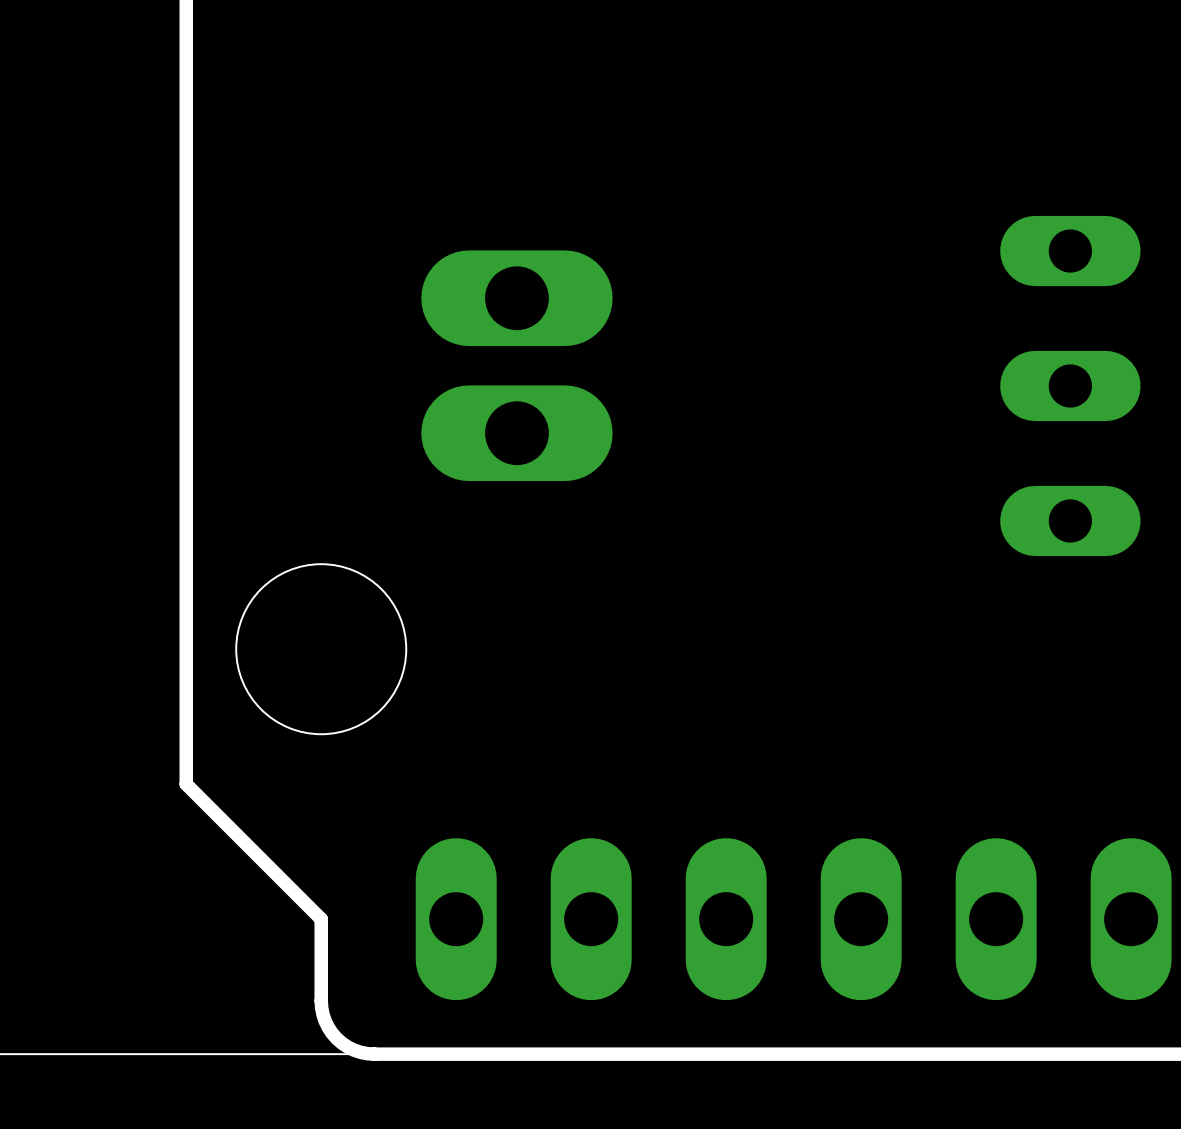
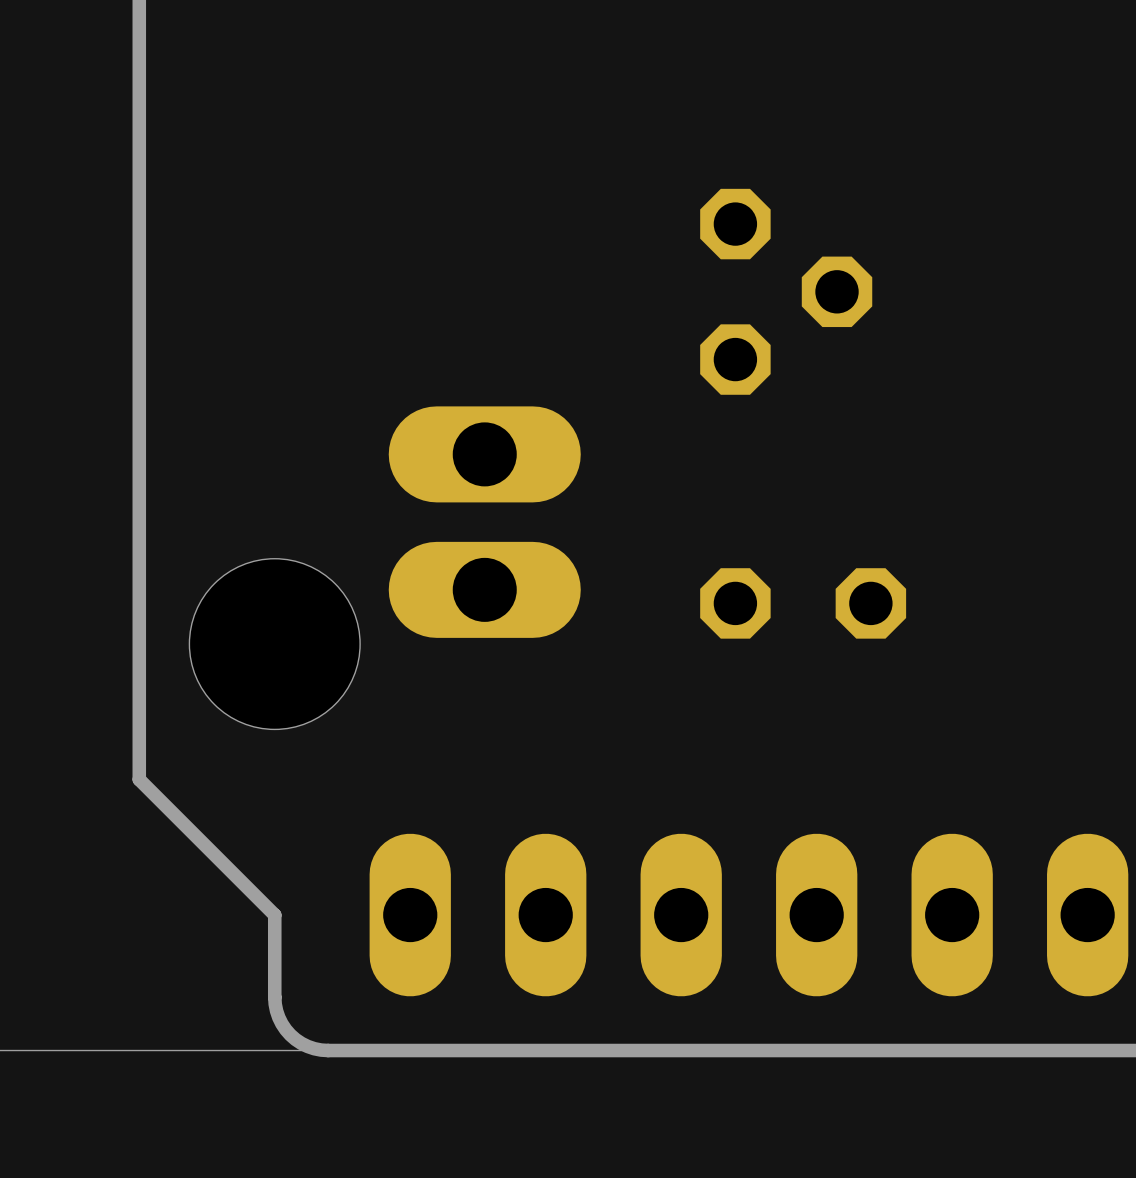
part: none -> (786, 291)
part position: (516, 365) -> (484, 522)
part: (1070, 385) -> none
part: none -> (803, 603)

